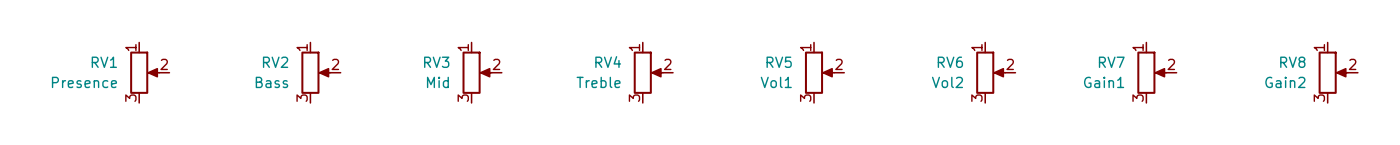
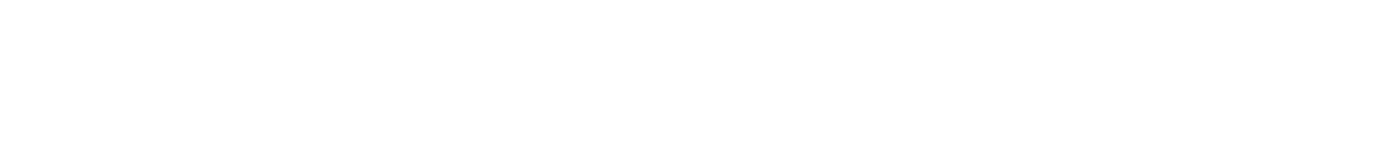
RV1: Presence (149, 72) -> none
RV2: Bass (320, 72) -> none
RV3: Mid (482, 72) -> none
RV4: Treble (653, 72) -> none
RV5: Vol1 (824, 72) -> none
RV6: Vol2 (995, 72) -> none
RV7: Gain1 (1156, 72) -> none
RV8: Gain2 (1338, 72) -> none

